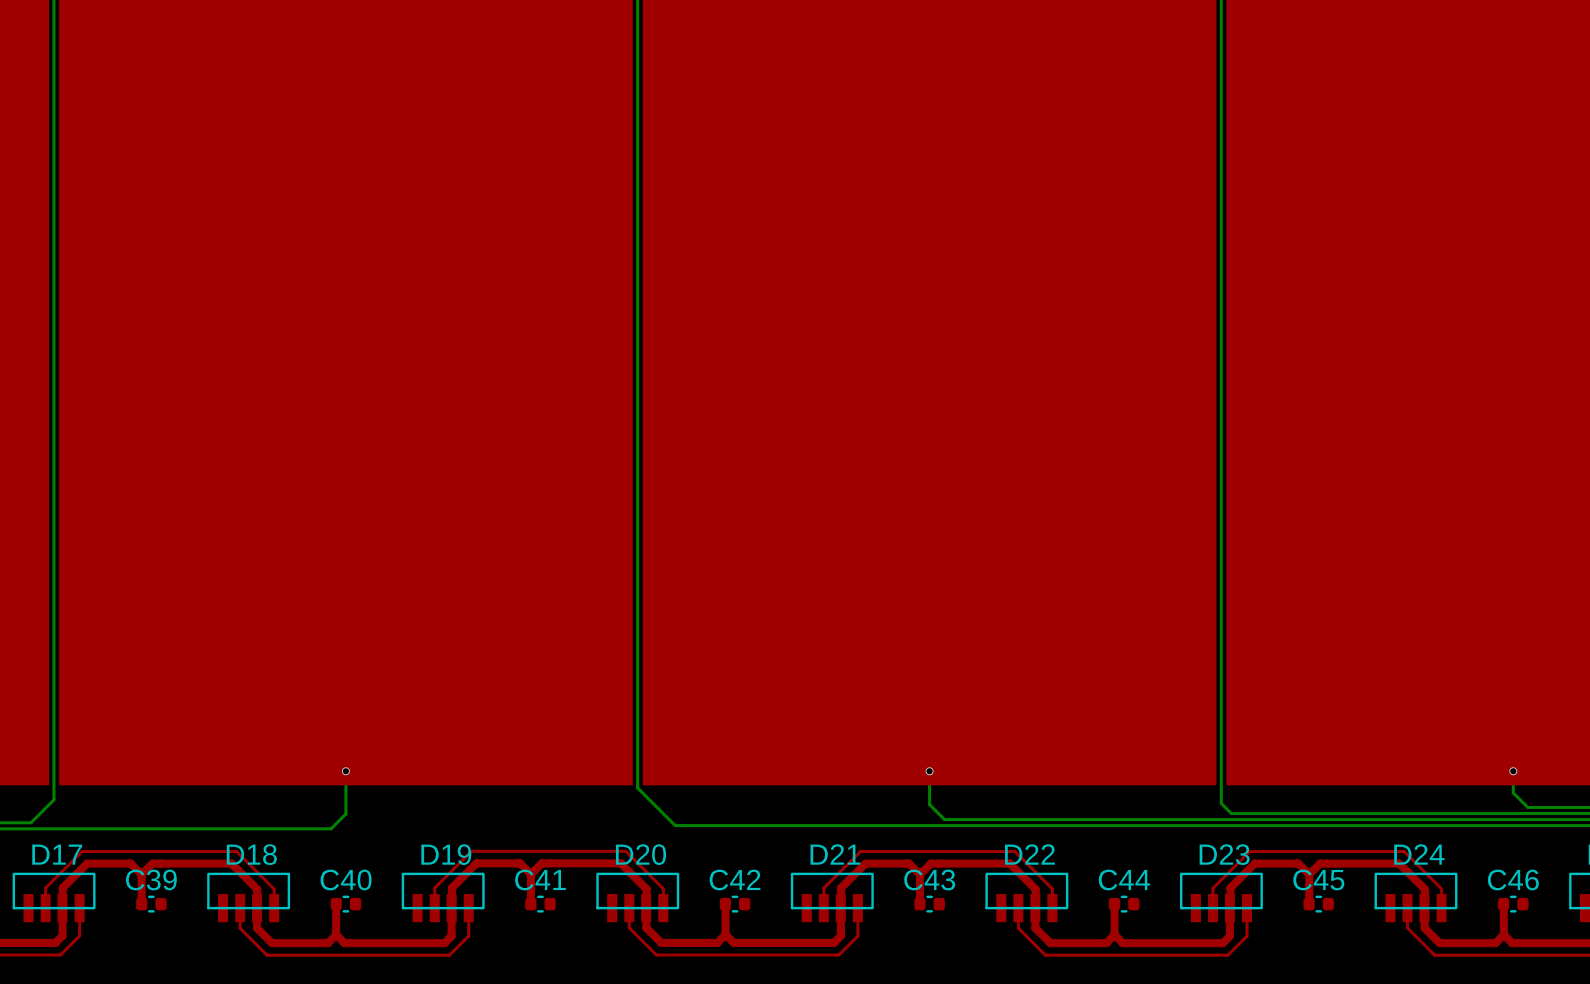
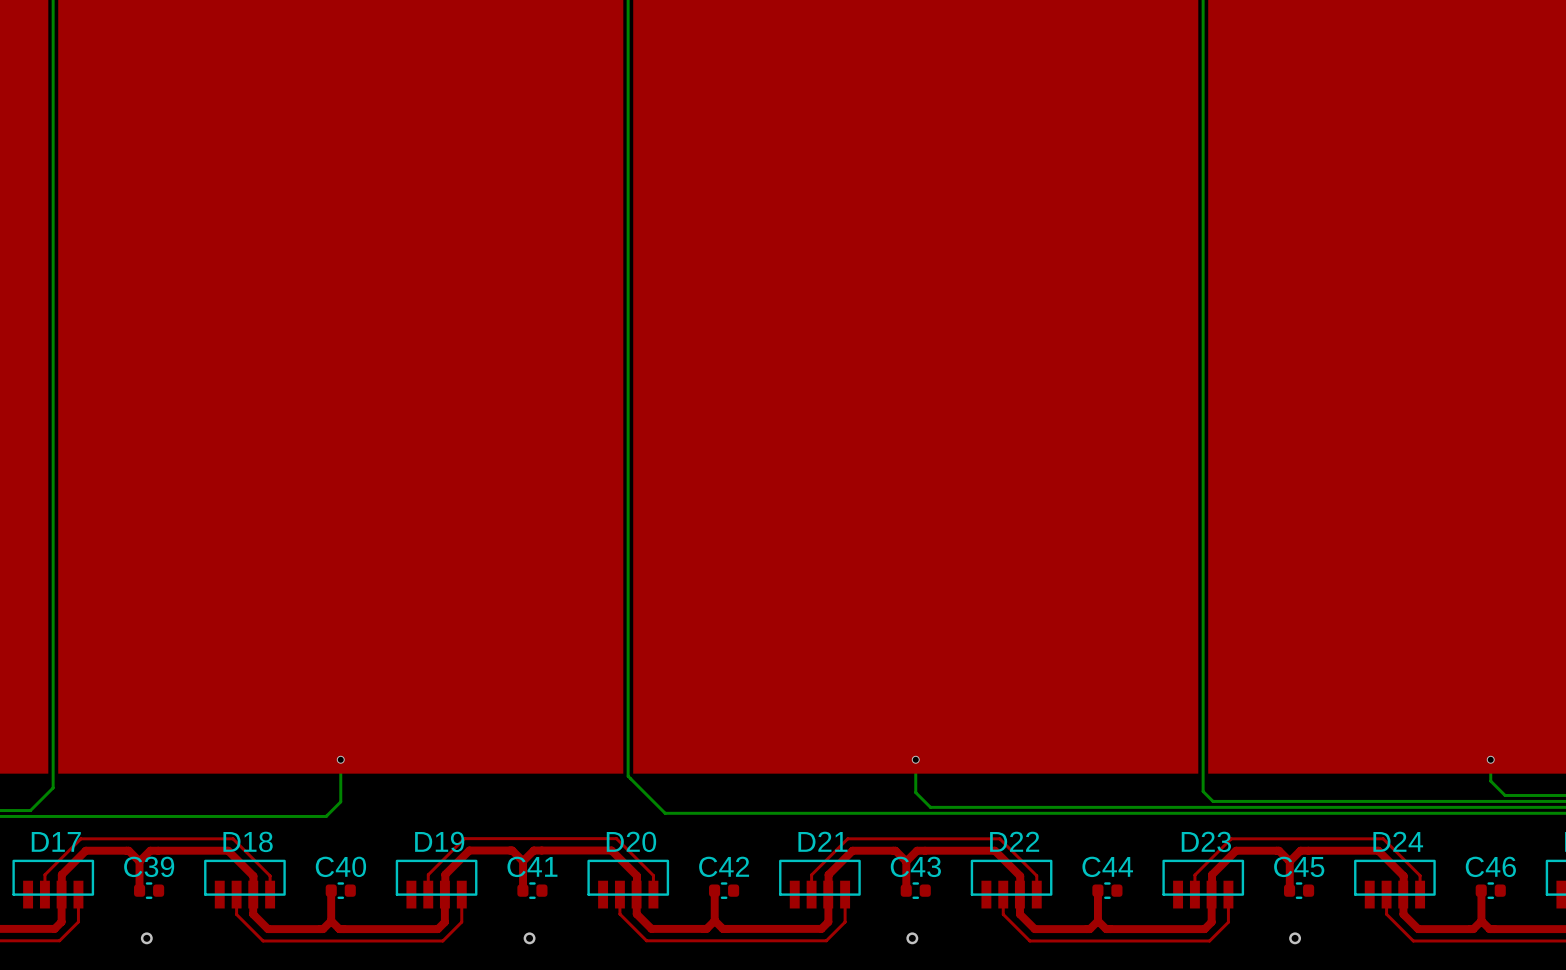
via: none -> (146, 938)
via: none -> (529, 938)
via: none -> (912, 938)
via: none -> (1295, 938)

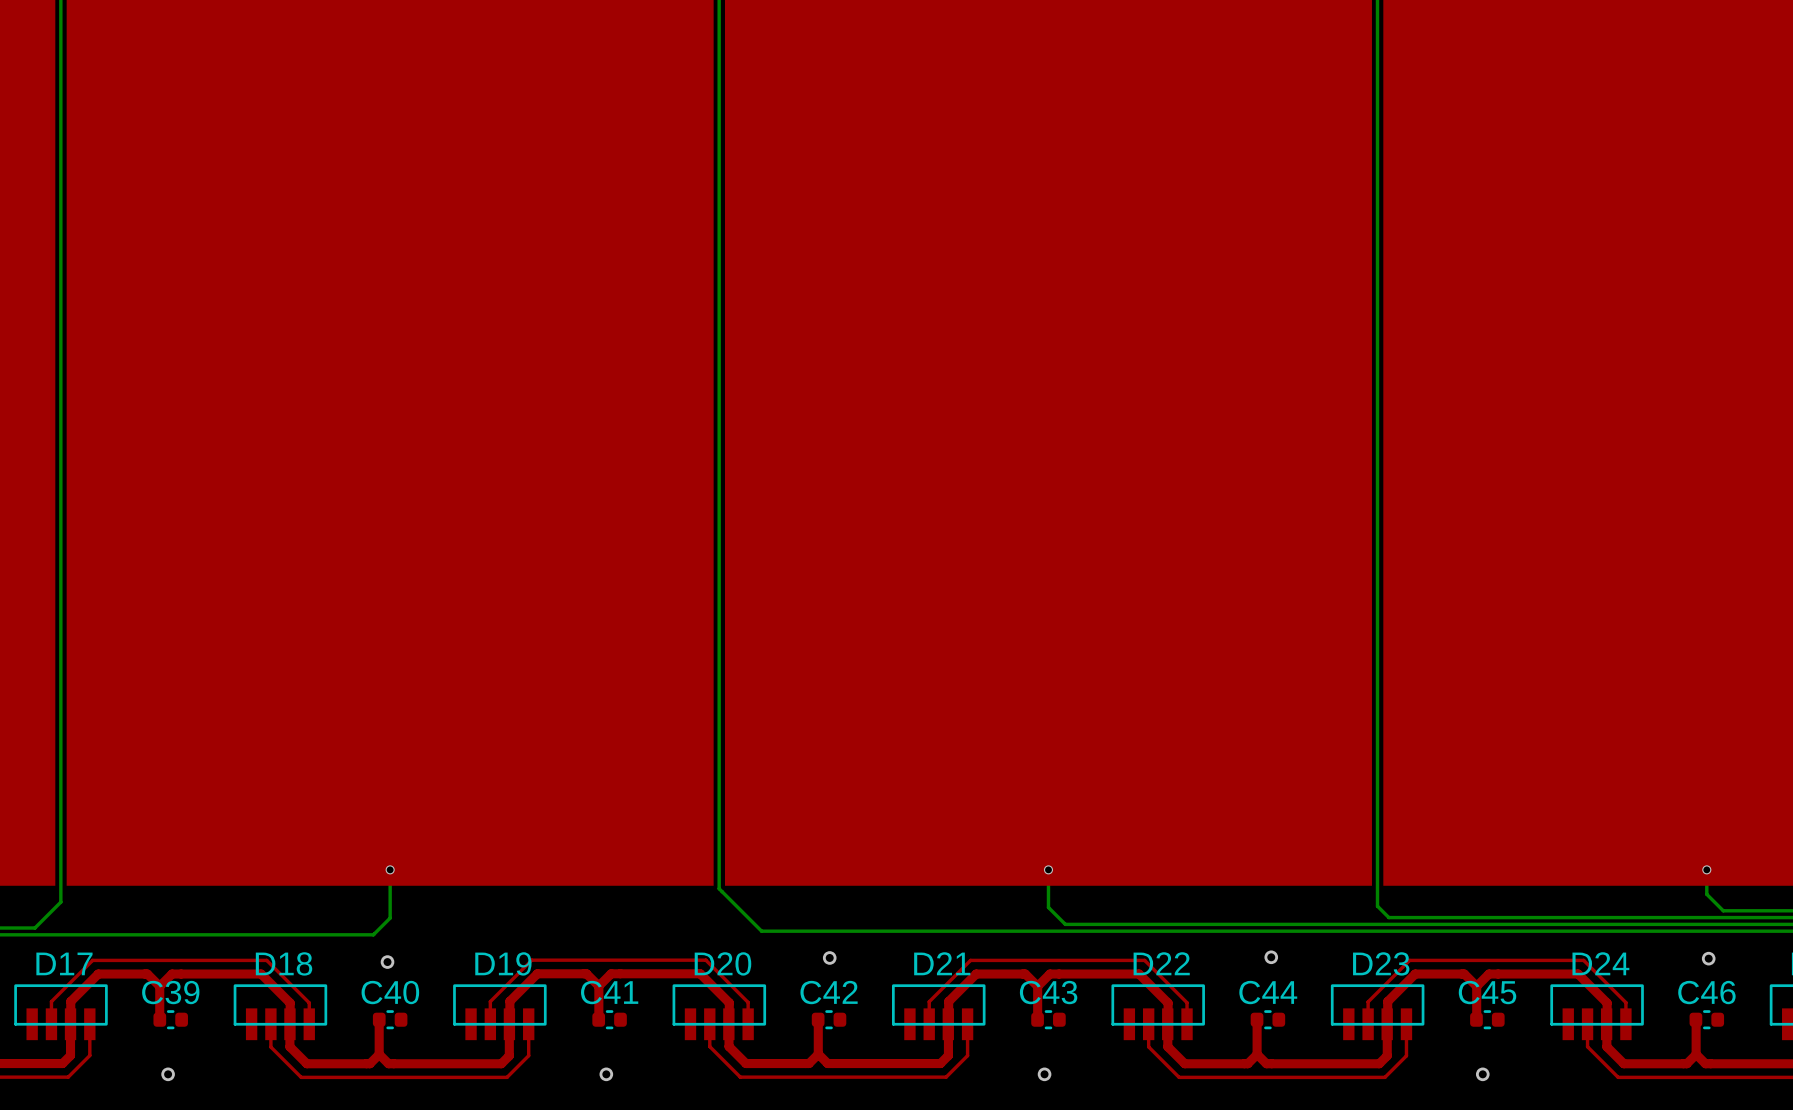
via: none -> (829, 957)
via: none -> (1271, 957)
via: none -> (1708, 958)
via: none -> (387, 962)

